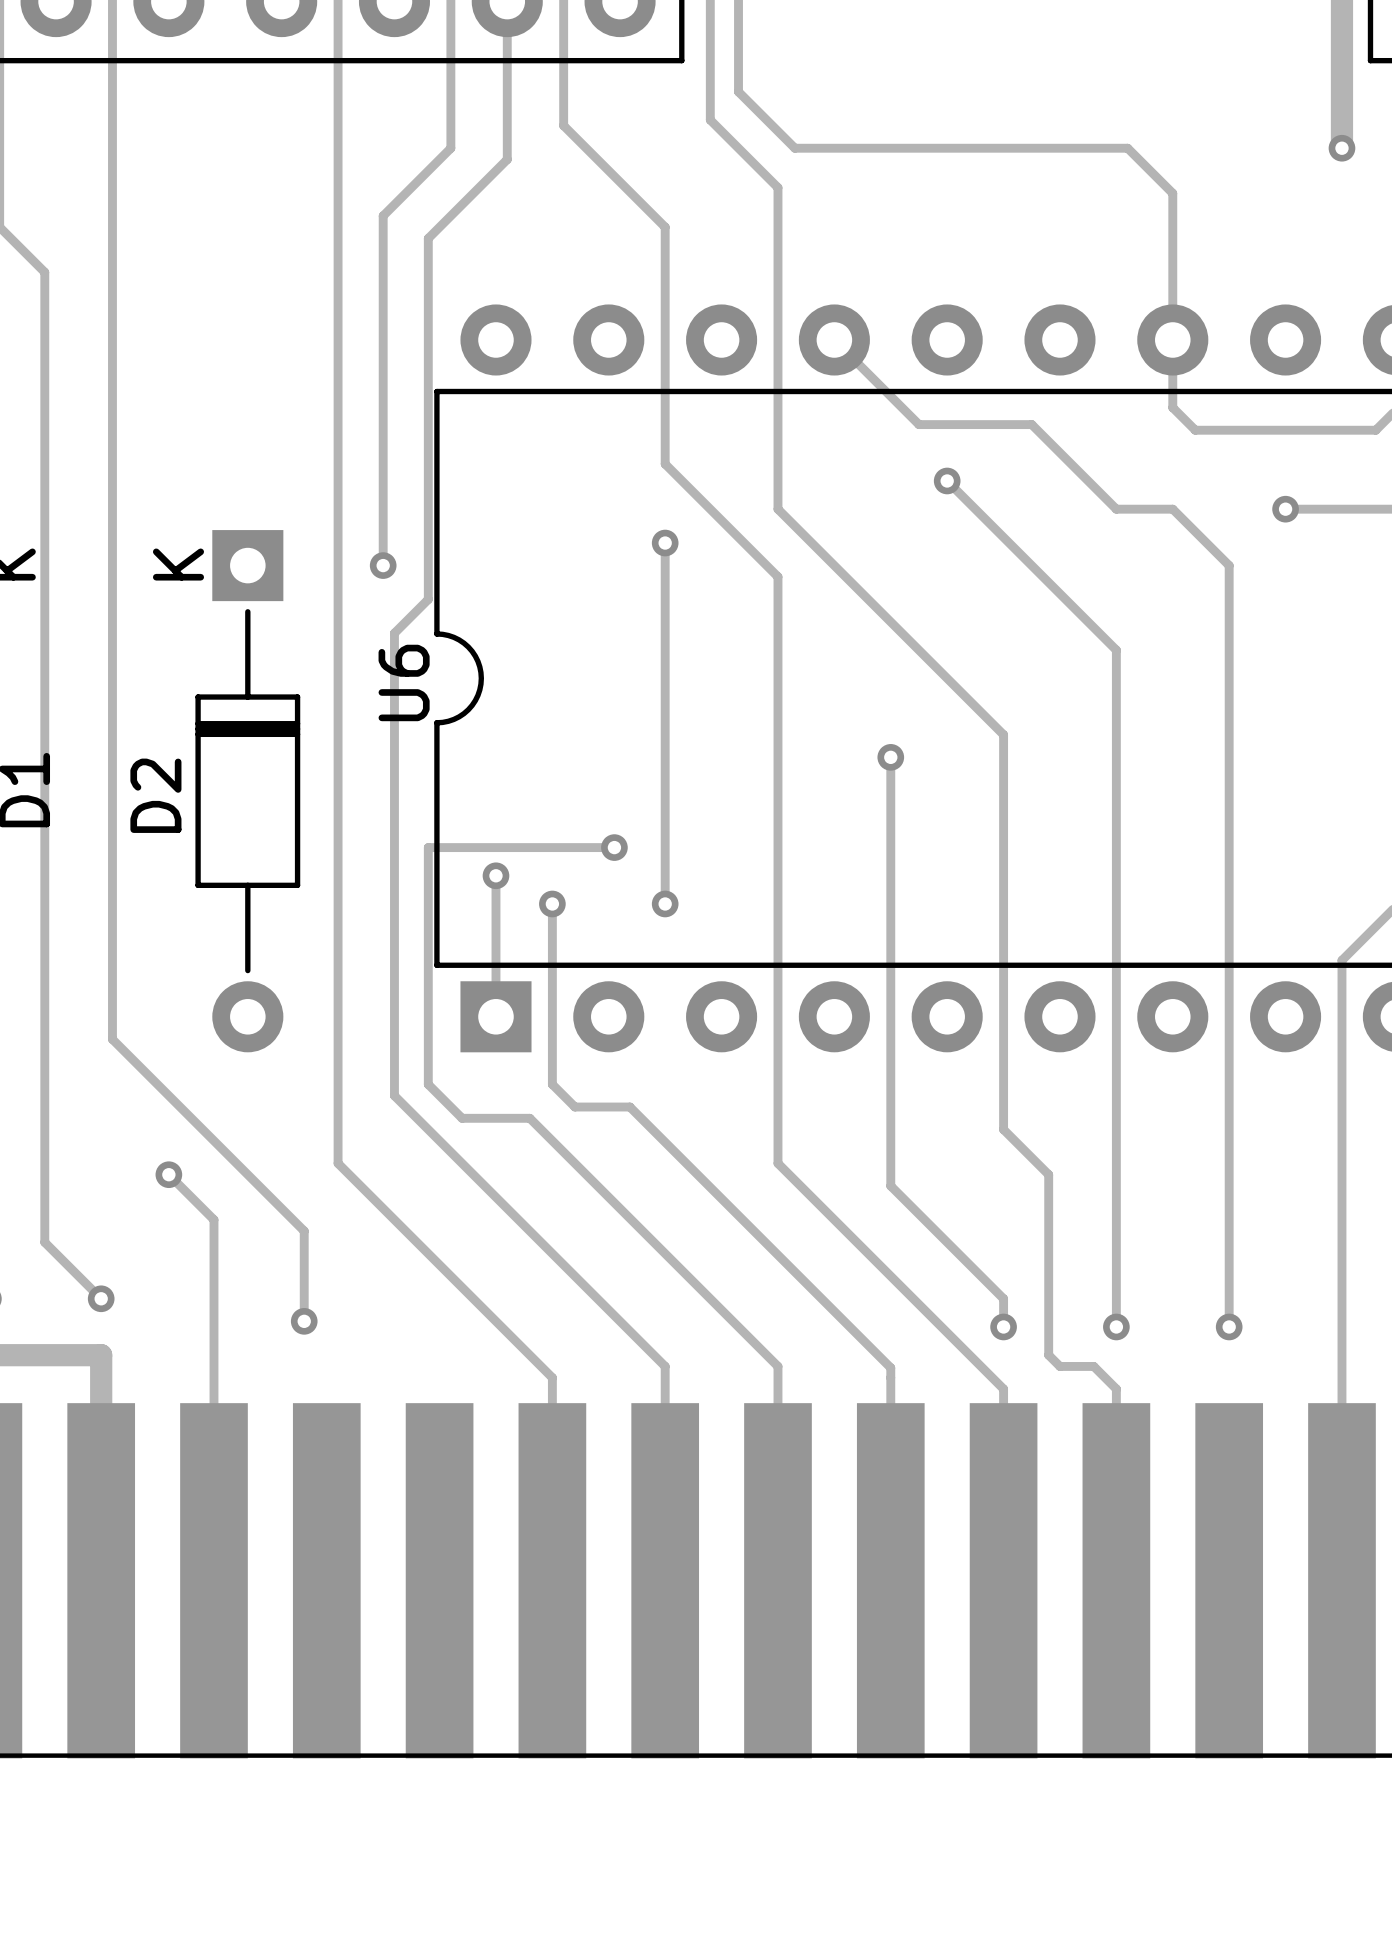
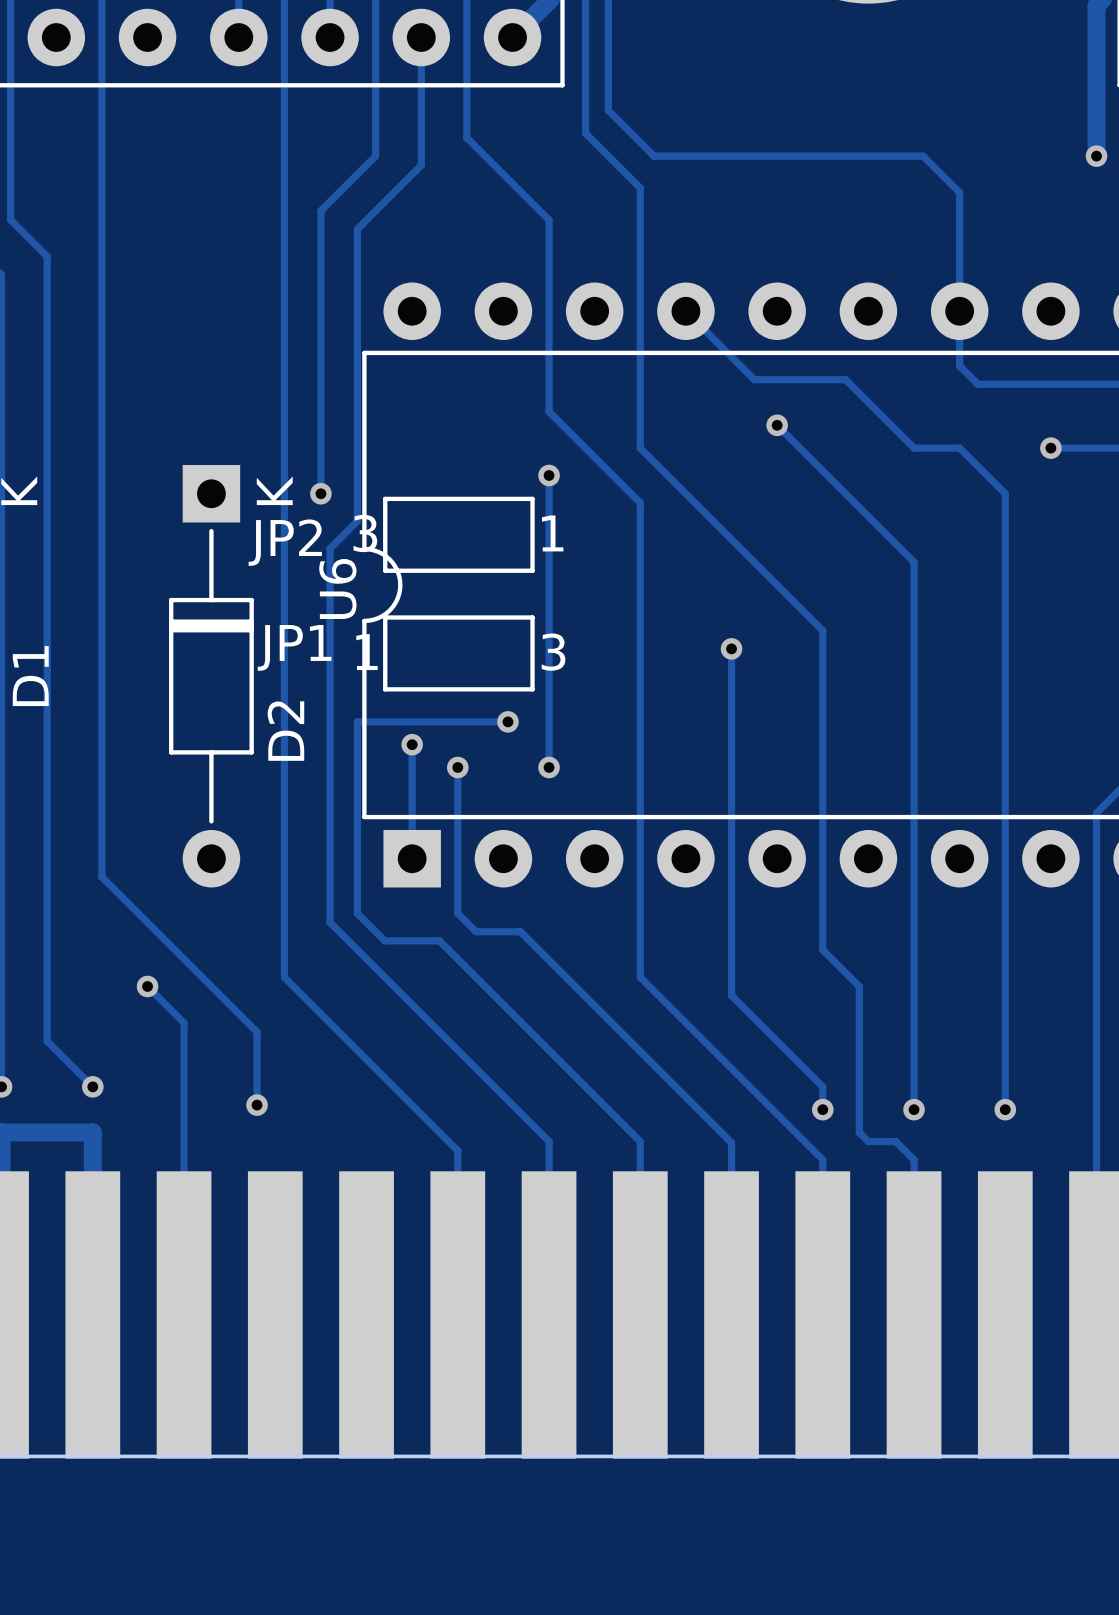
D2 text position: K (178, 564) -> K (274, 490)
JP2: none -> (458, 534)
JP1: none -> (458, 653)
D2 name position: D2 (155, 795) -> D2 (285, 731)

